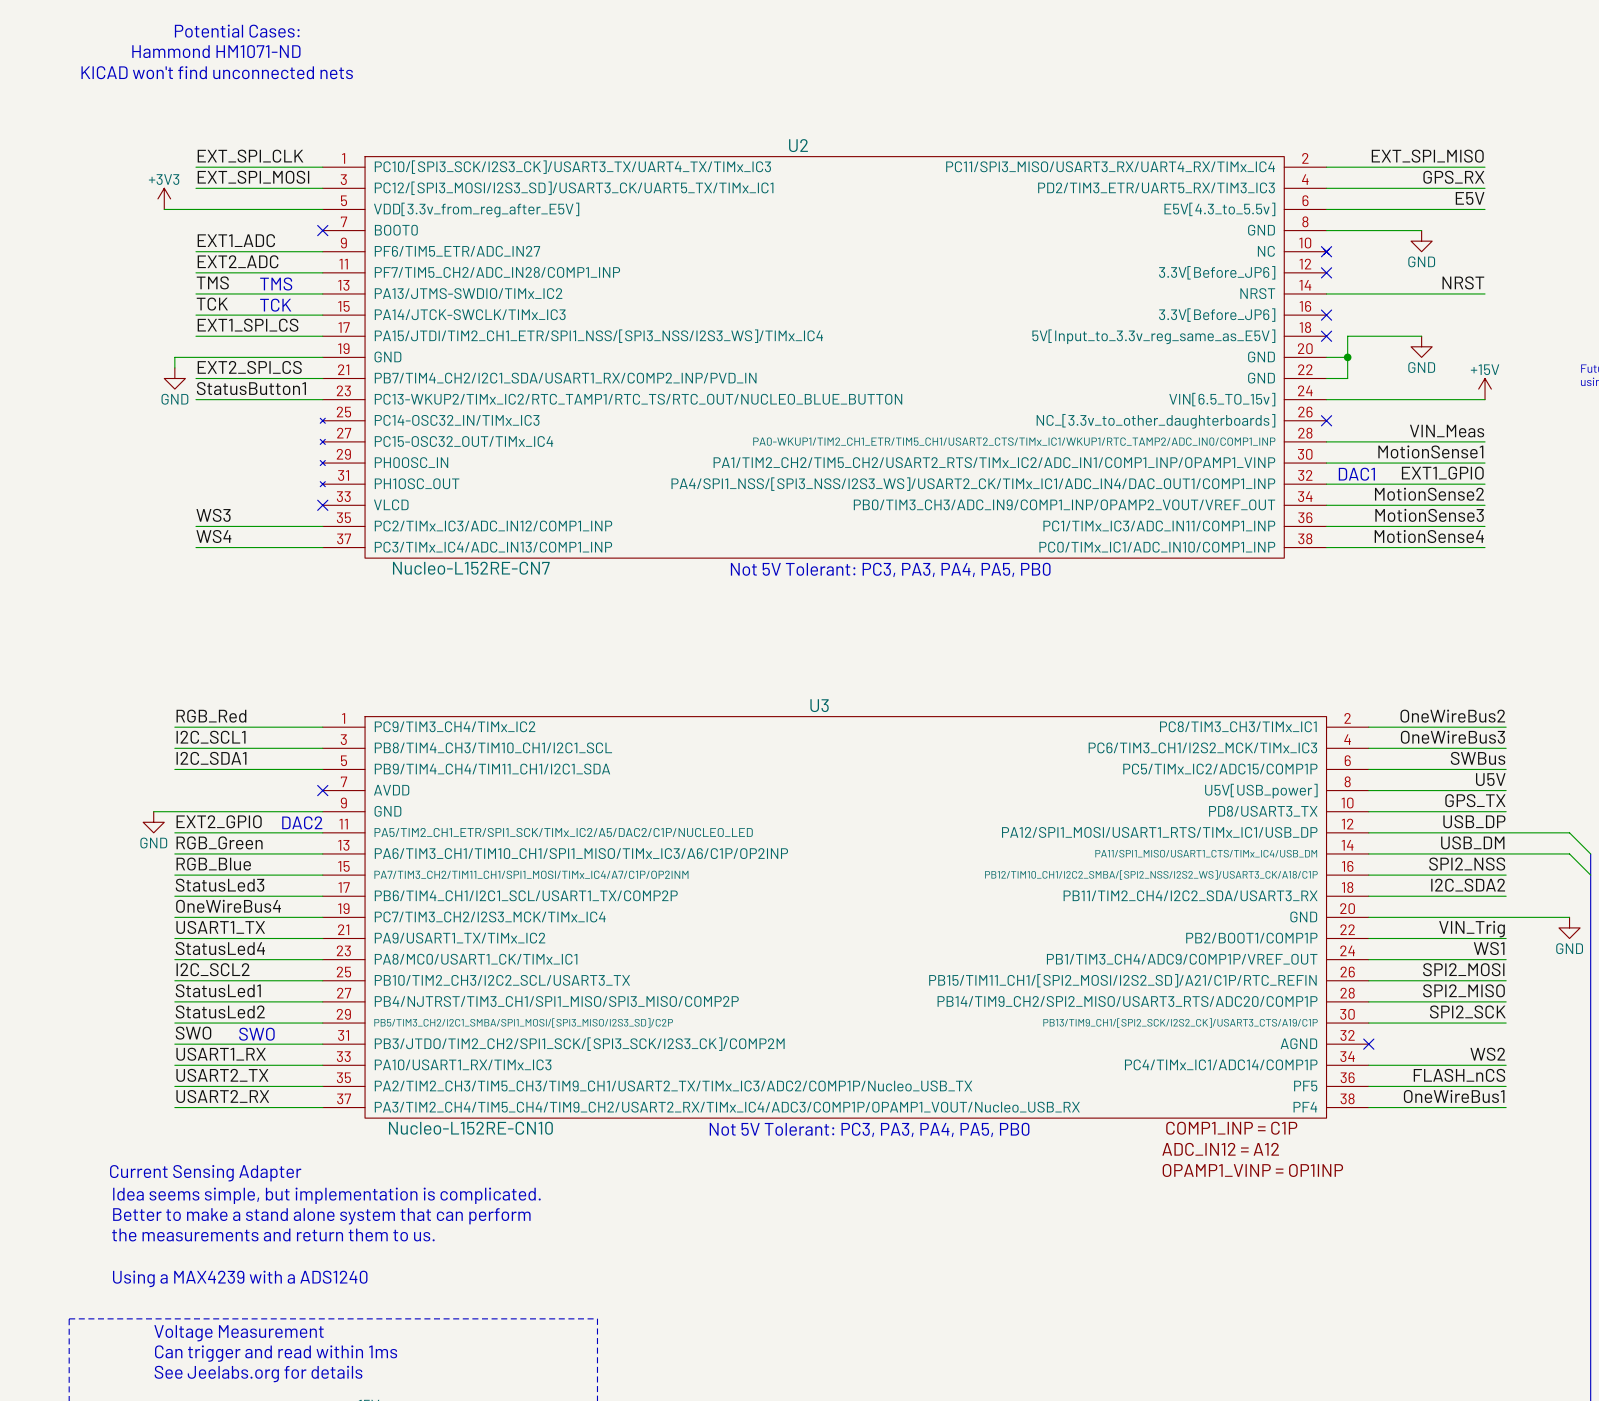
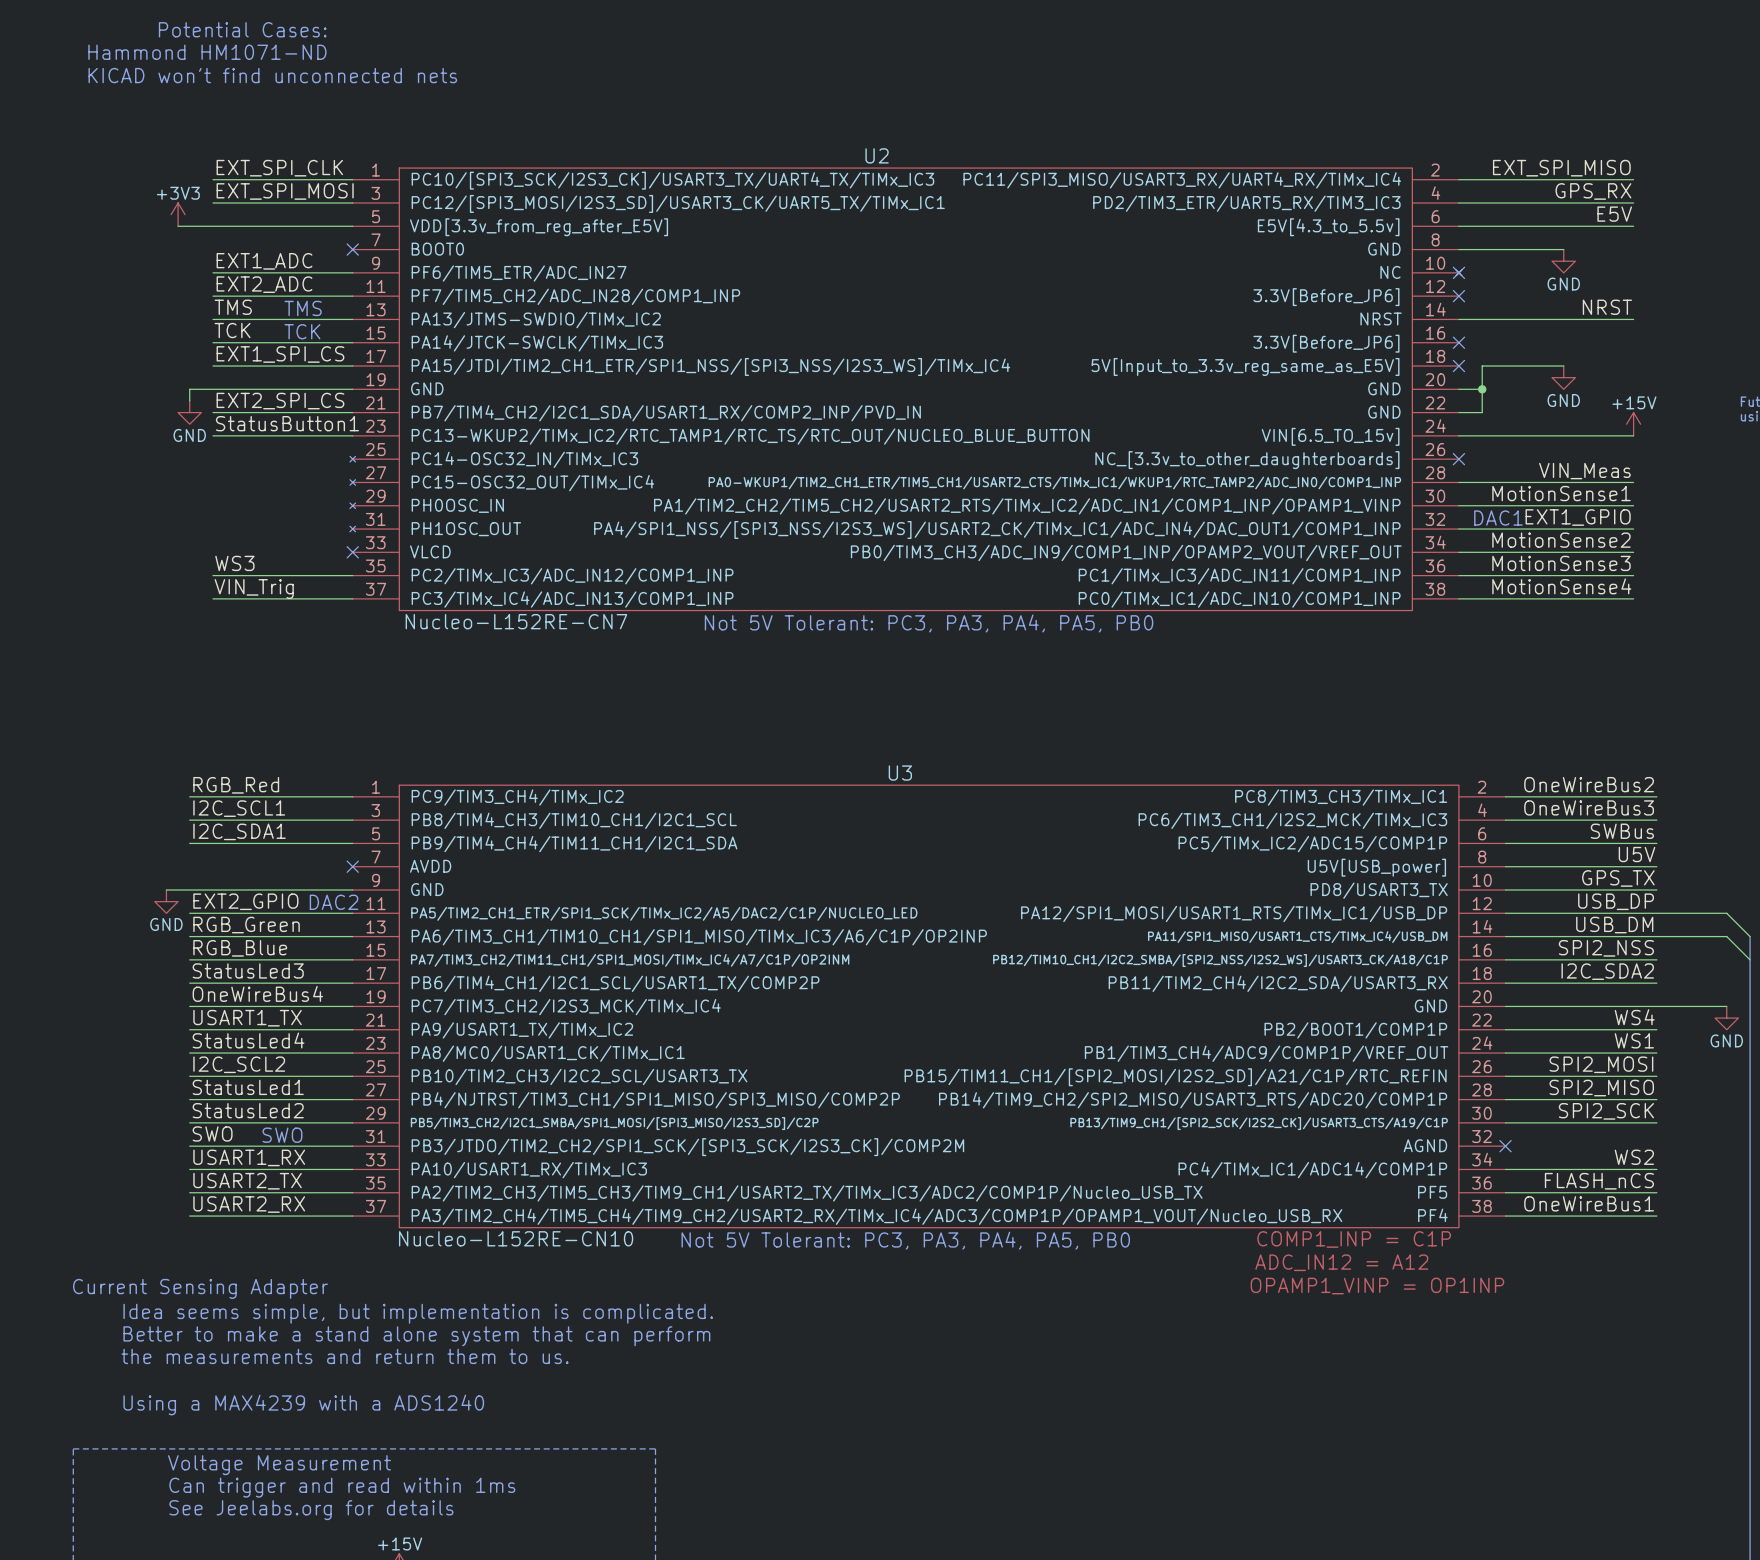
label: WS4 (213, 536) -> VIN_Trig (254, 589)
label: VIN_Trig (1472, 929) -> WS4 (1634, 1017)

